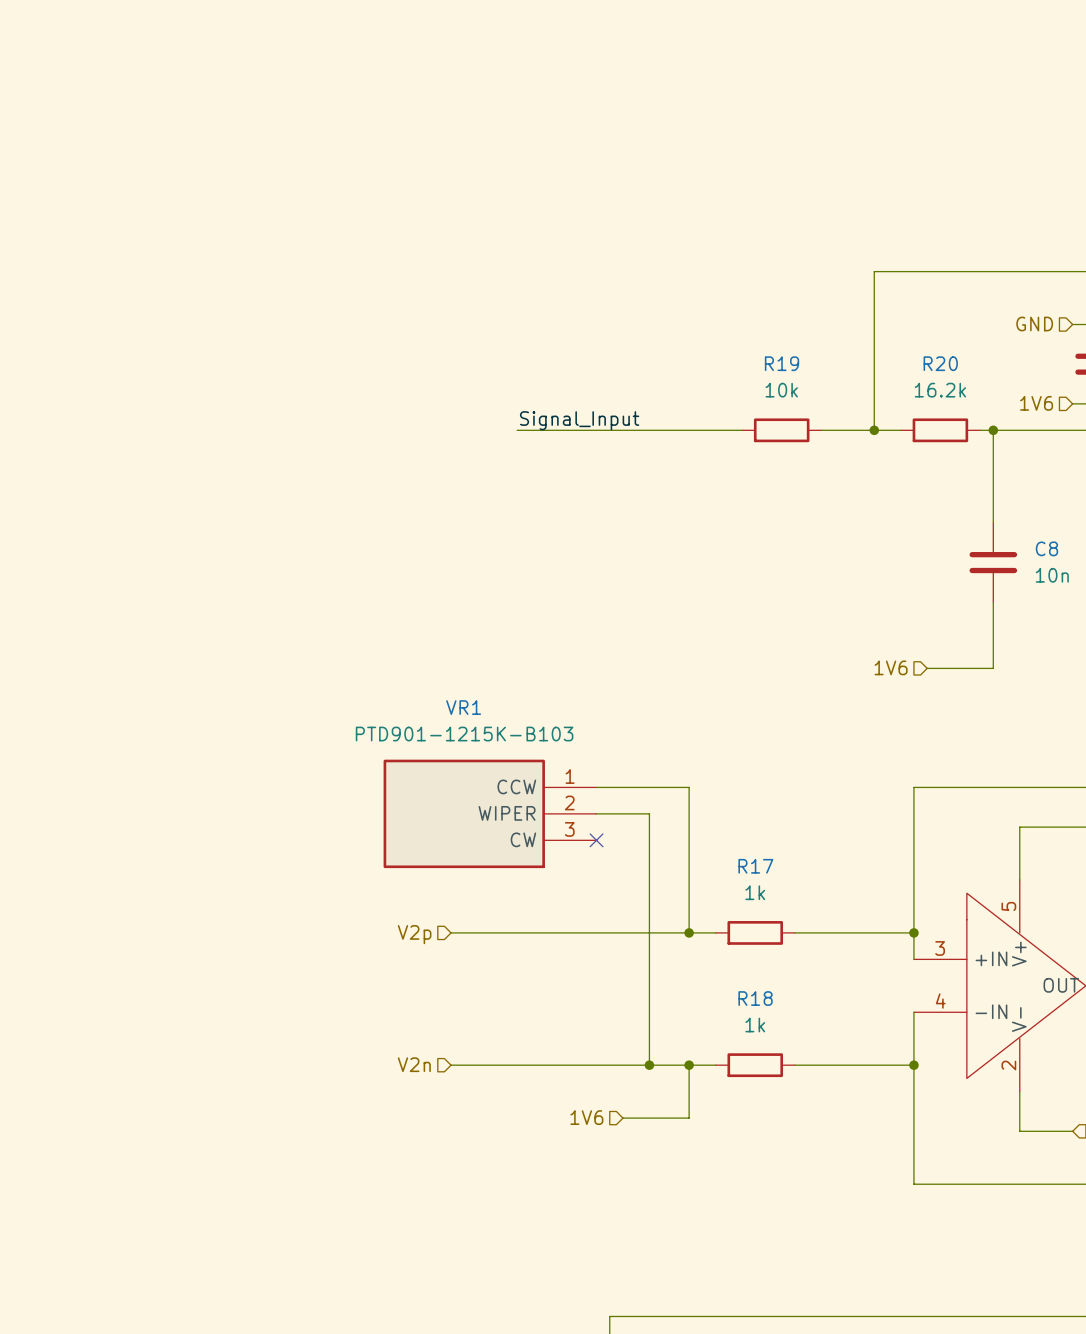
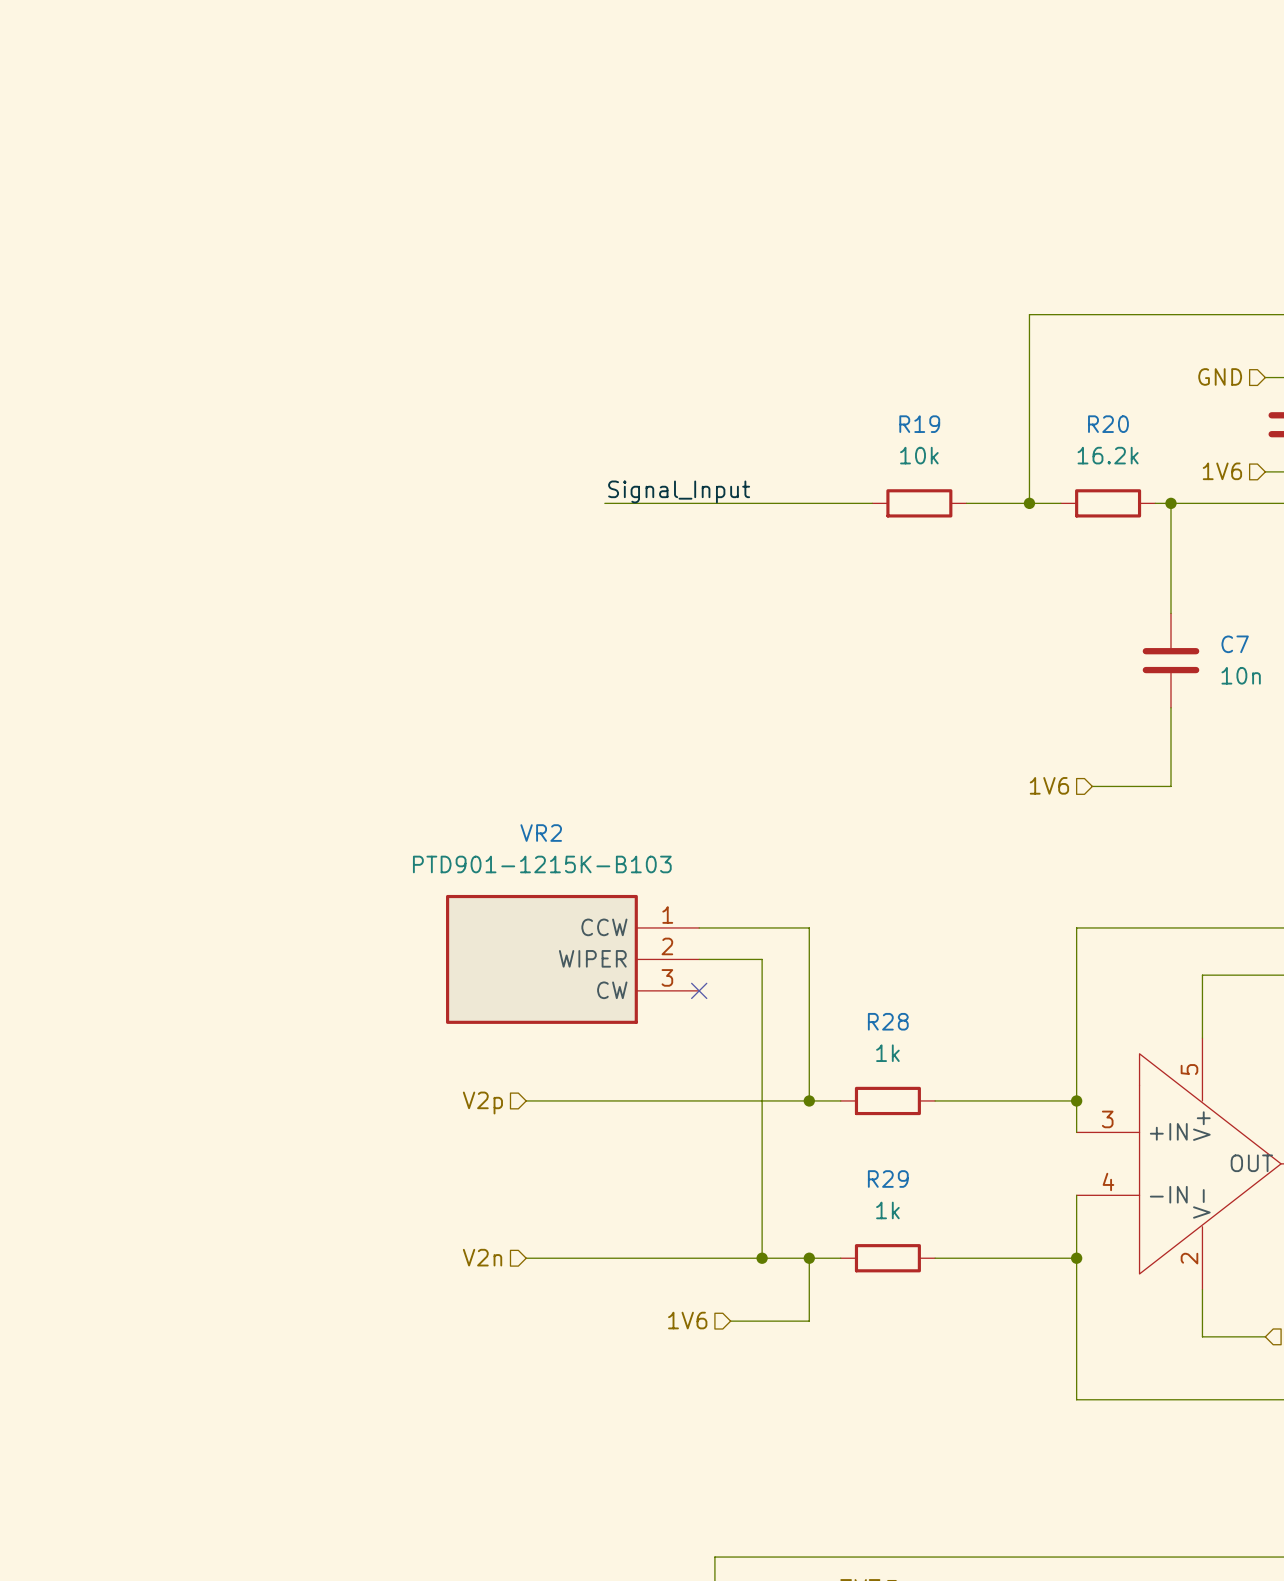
C8 name: C8 (1046, 548) -> C7 (1235, 644)
VR1 name: VR1 (463, 707) -> VR2 (541, 833)
R17 name: R17 (755, 866) -> R28 (888, 1021)
R18 name: R18 (755, 998) -> R29 (888, 1179)

